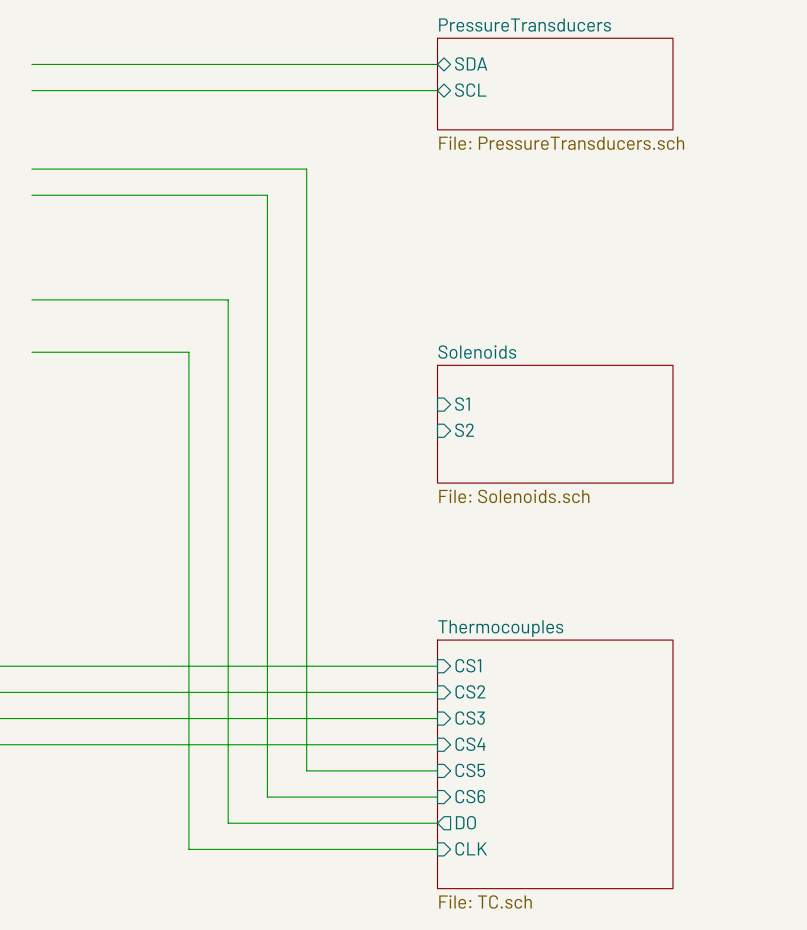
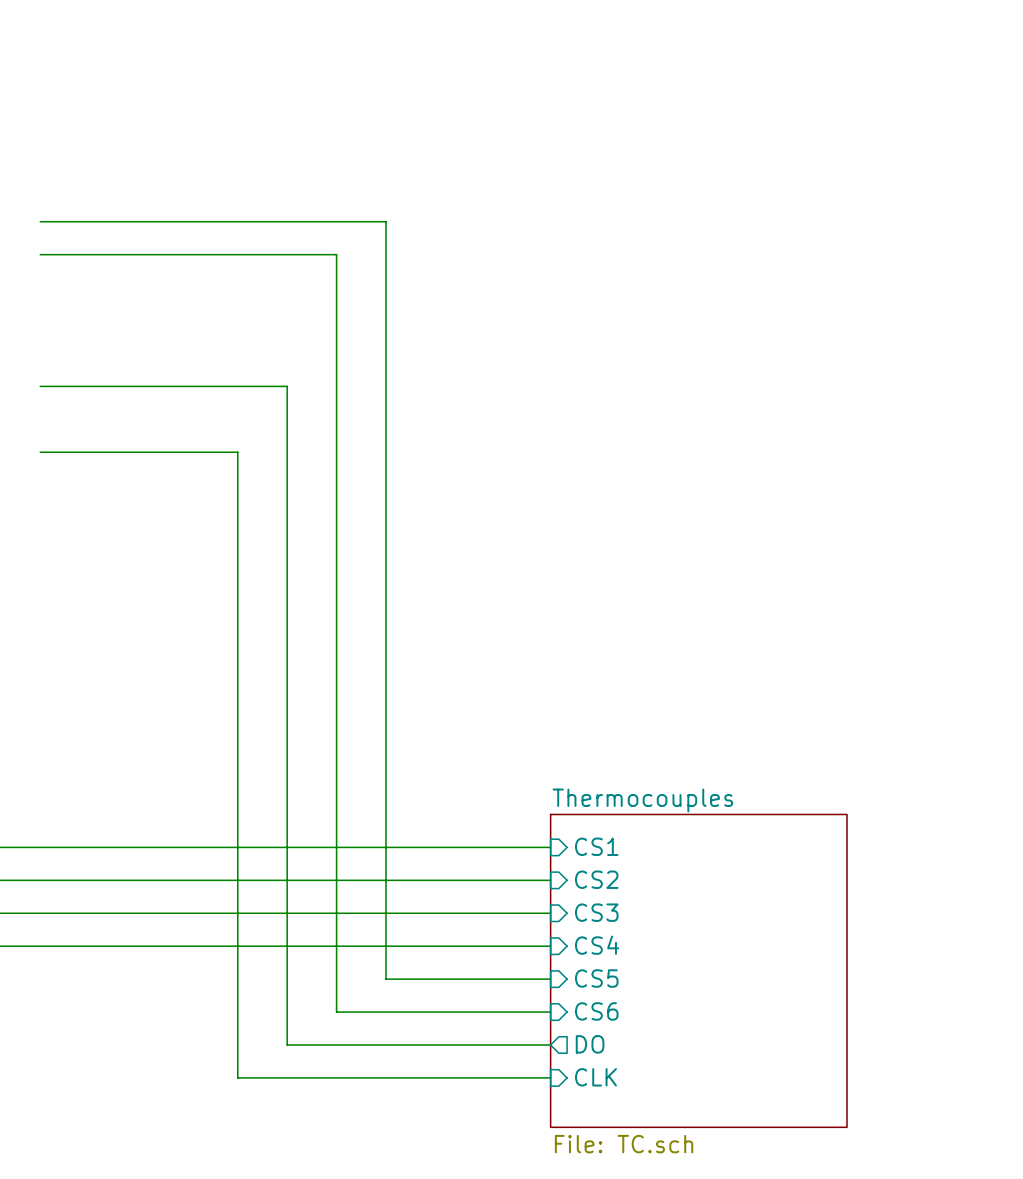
sheet pin: SDA (471, 63) -> none
wire: (31, 64) (437, 64) -> none
sheet PressureTransducers: File: PressureTransducers.sch (555, 84) -> none
wire: (31, 90) (437, 90) -> none
sheet pin: SCL (470, 90) -> none
sheet pin: S1 (462, 404) -> none
sheet Solenoids: File: Solenoids.sch (555, 424) -> none
sheet pin: S2 (464, 430) -> none

